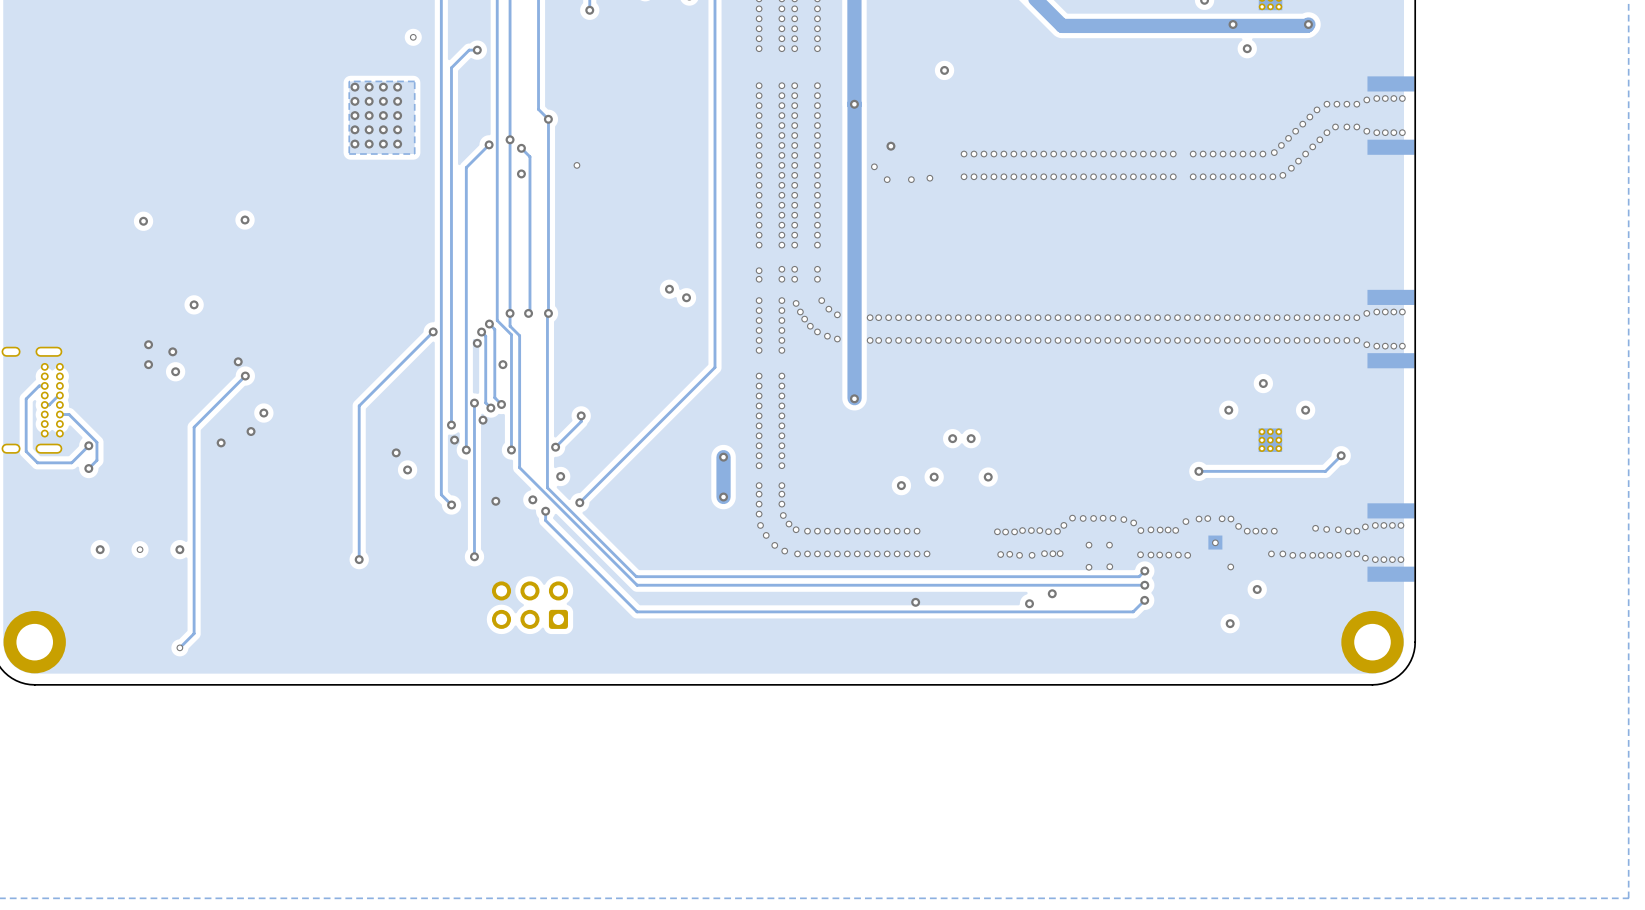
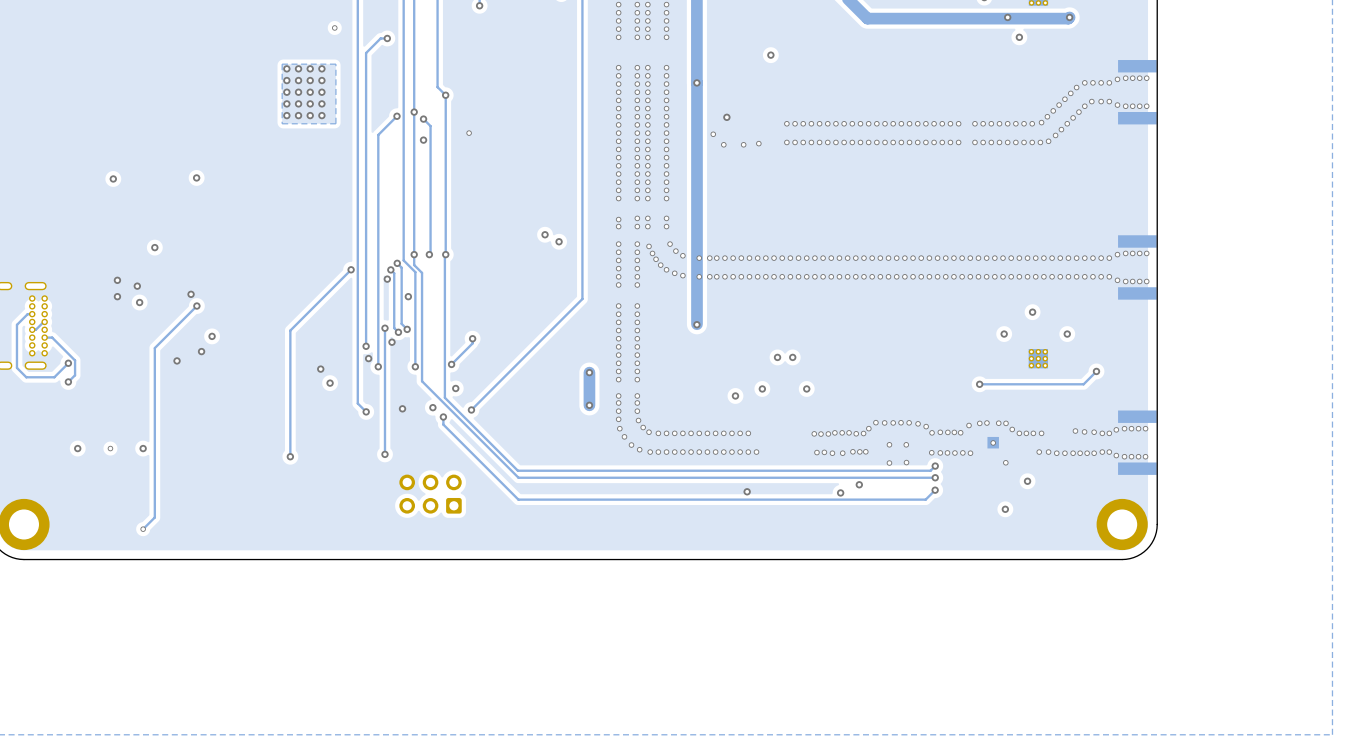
via: none -> (699, 258)
via: none -> (699, 276)

